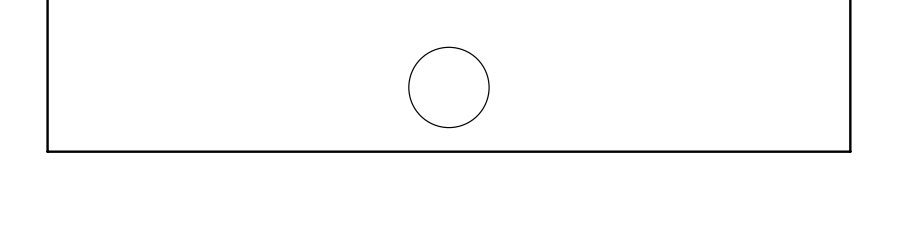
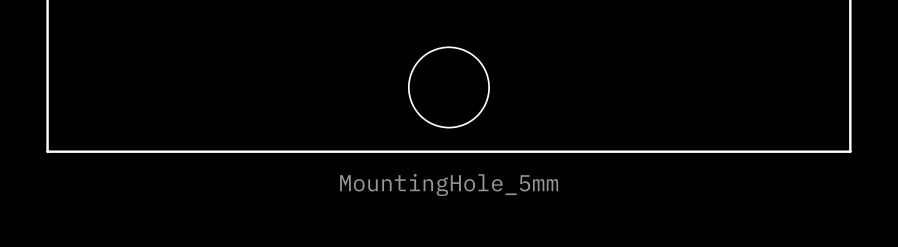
part value: none -> MountingHole_5mm (449, 185)

